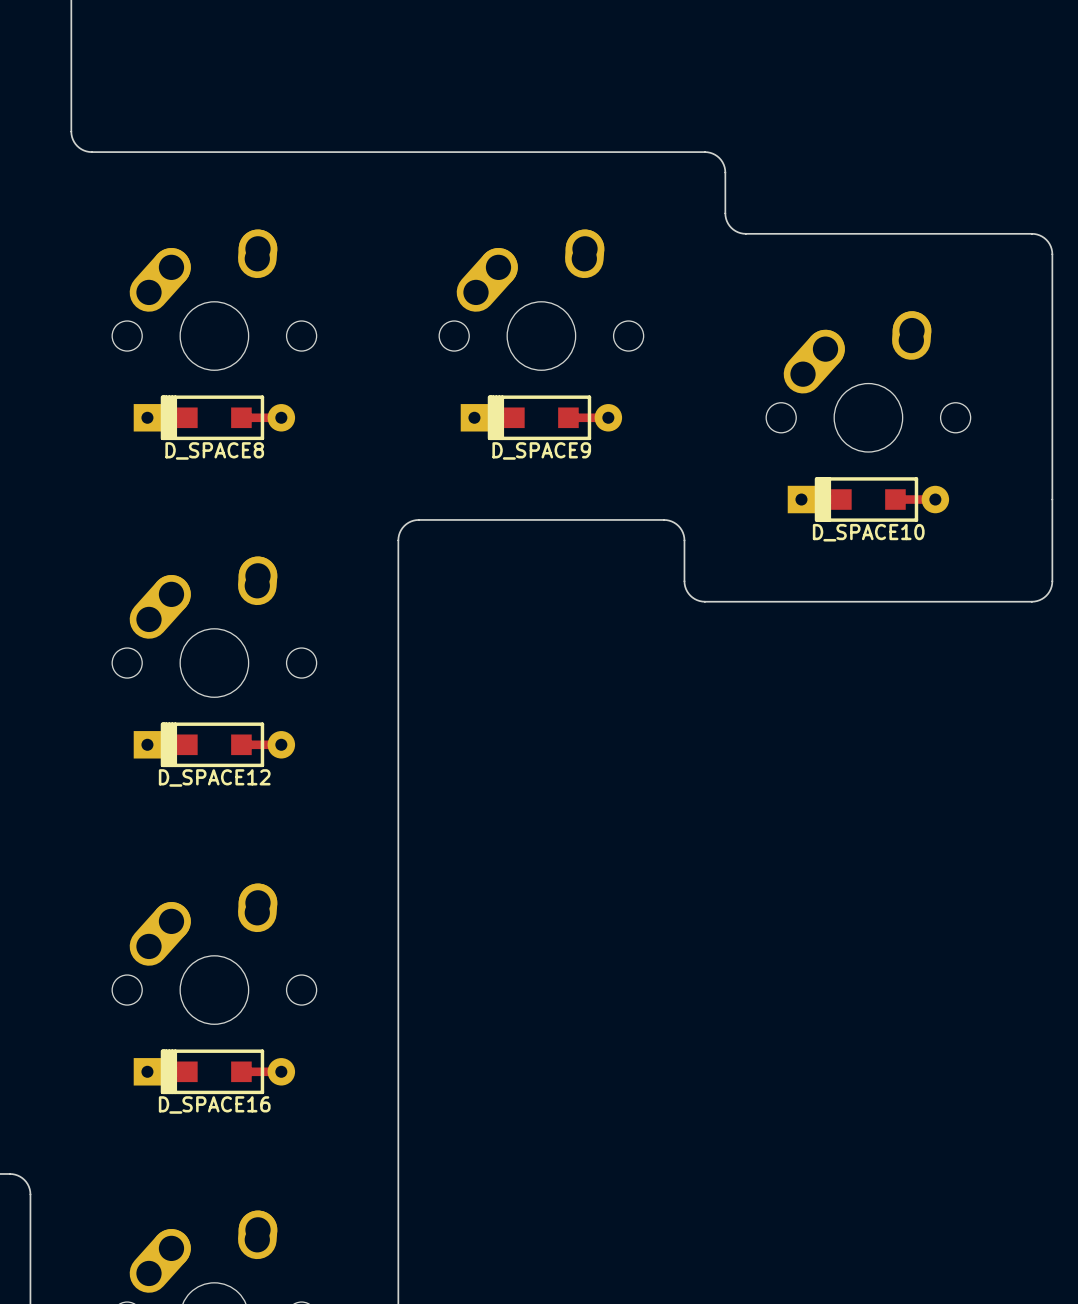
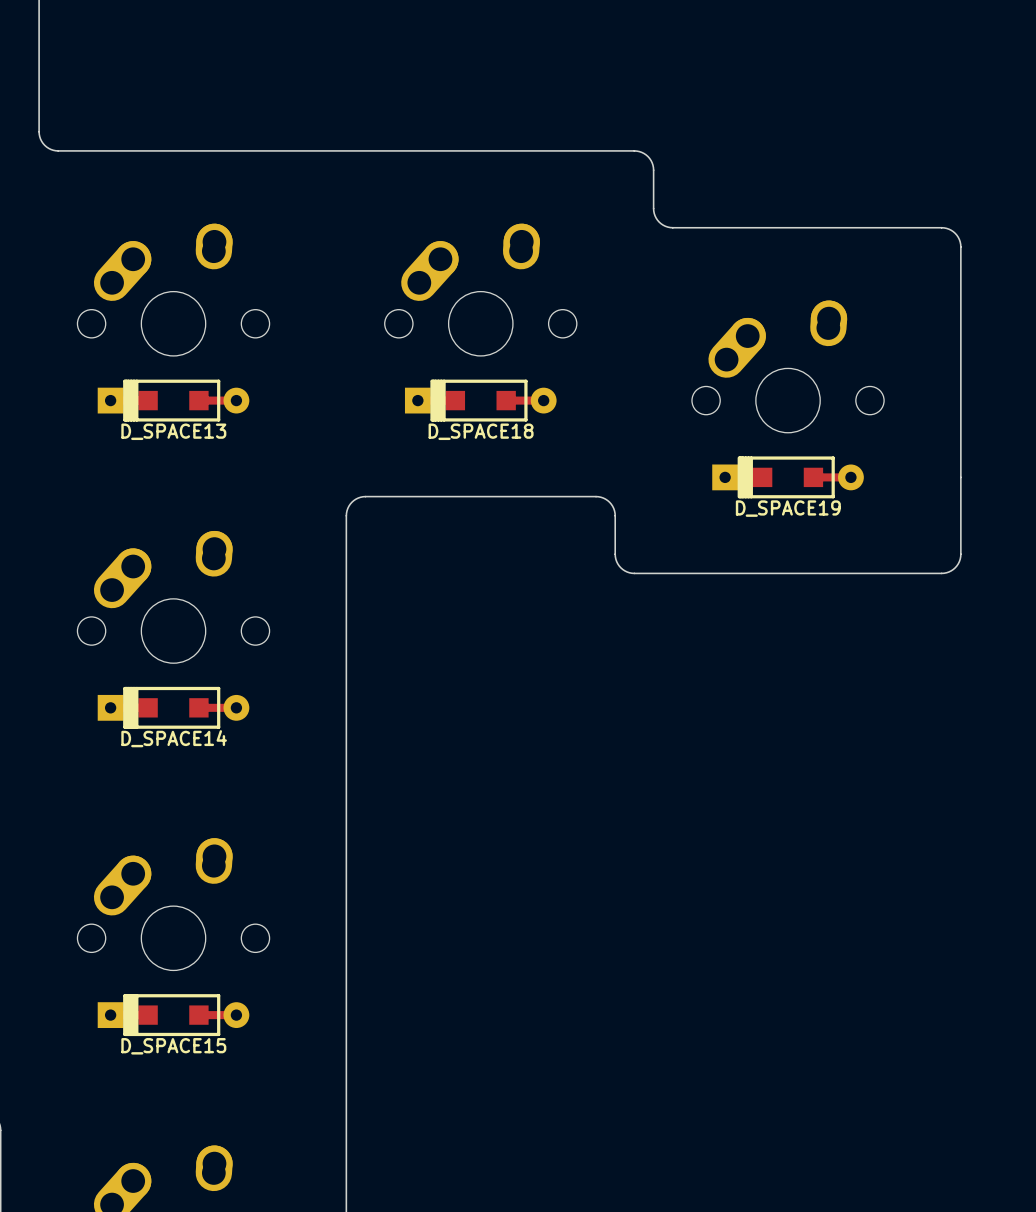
D_SPACE8 name: D_SPACE8 (214, 450) -> D_SPACE13 (173, 431)
D_SPACE9 name: D_SPACE9 (541, 450) -> D_SPACE18 (481, 431)
D_SPACE10 name: D_SPACE10 (868, 532) -> D_SPACE19 (788, 508)
D_SPACE12 name: D_SPACE12 (214, 777) -> D_SPACE14 (174, 738)
D_SPACE16 name: D_SPACE16 (214, 1104) -> D_SPACE15 (173, 1046)

